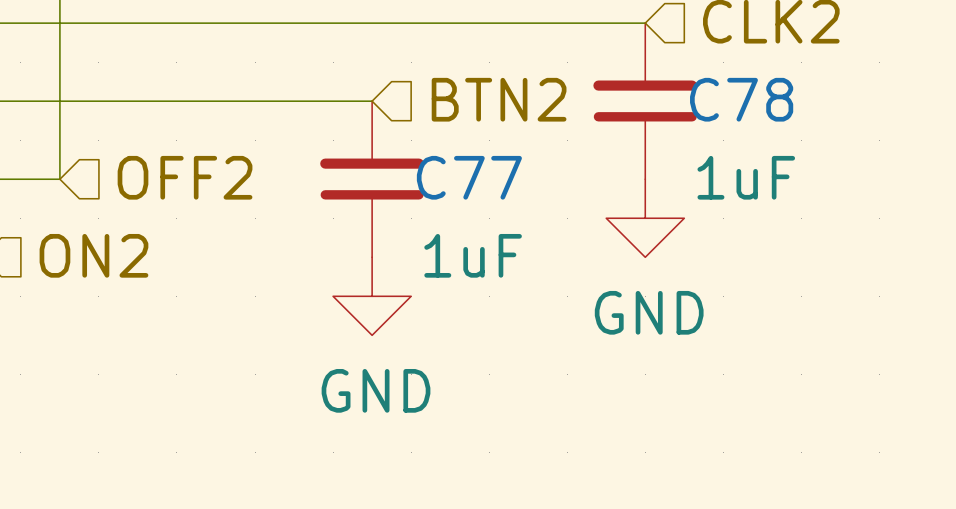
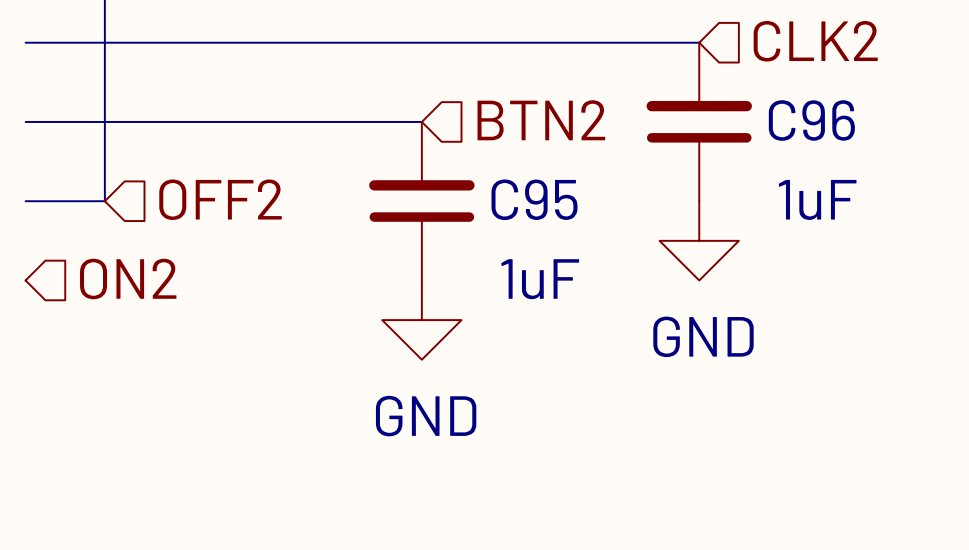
C78 name: C78 (741, 99) -> C96 (811, 120)
C77 name: C77 (469, 177) -> C95 (534, 199)

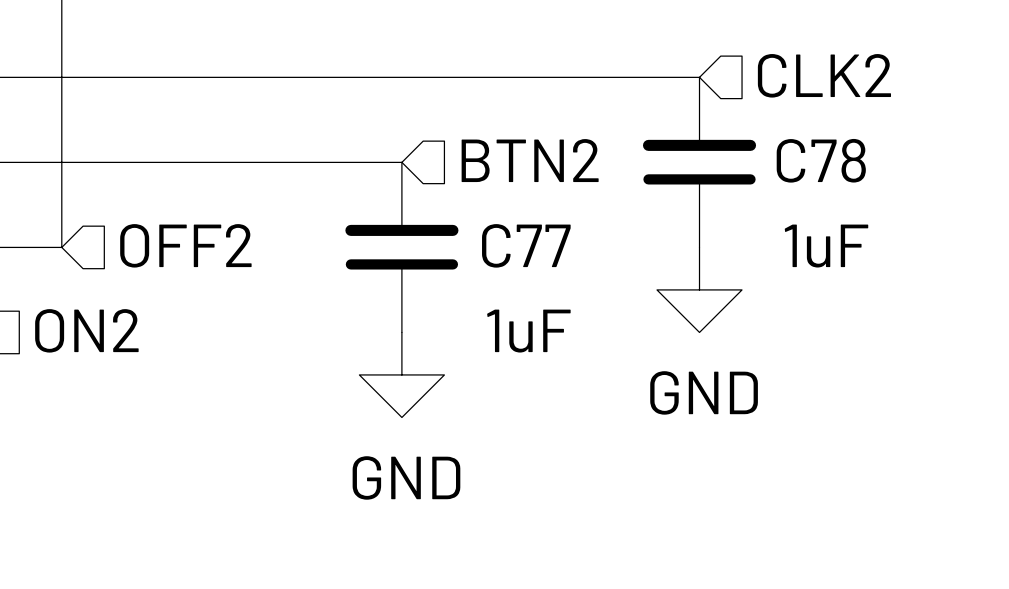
C96 name: C96 (811, 120) -> C78 (821, 160)
C95 name: C95 (534, 199) -> C77 (526, 245)

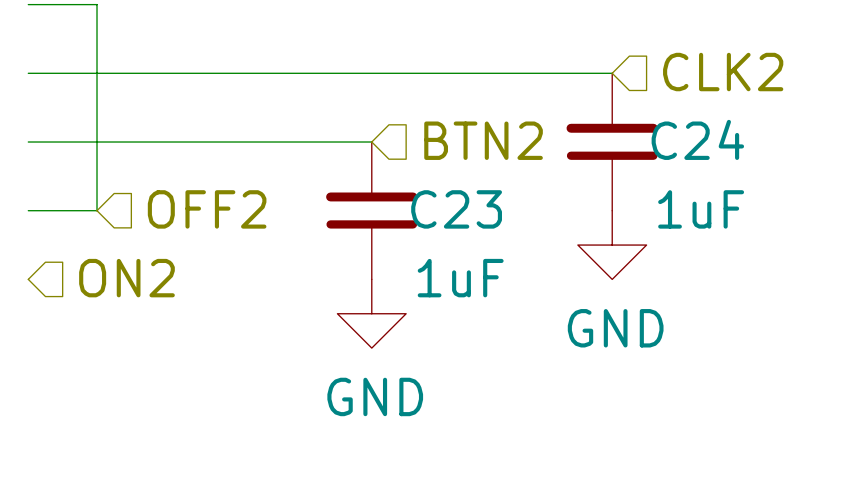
C78 name: C78 (821, 160) -> C24 (697, 139)
C77 name: C77 (526, 245) -> C23 (456, 209)

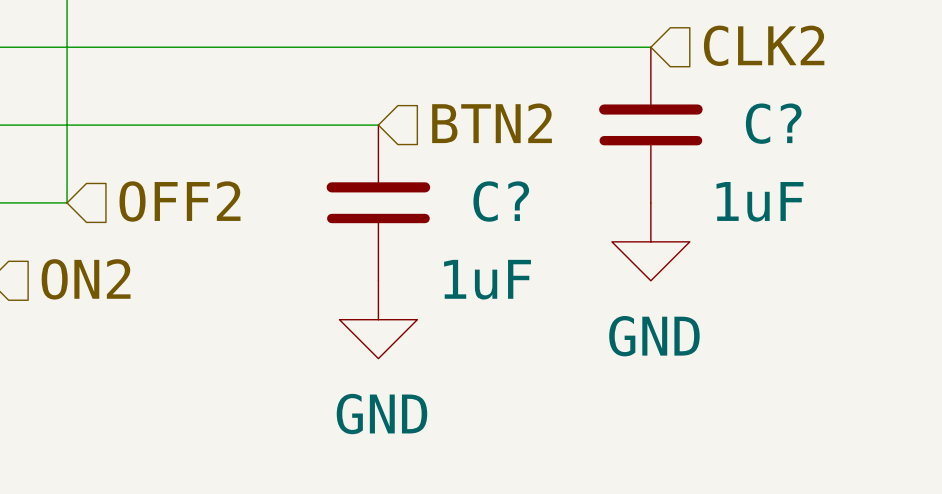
C24 name: C24 (697, 139) -> C? (773, 123)
C23 name: C23 (456, 209) -> C? (501, 201)

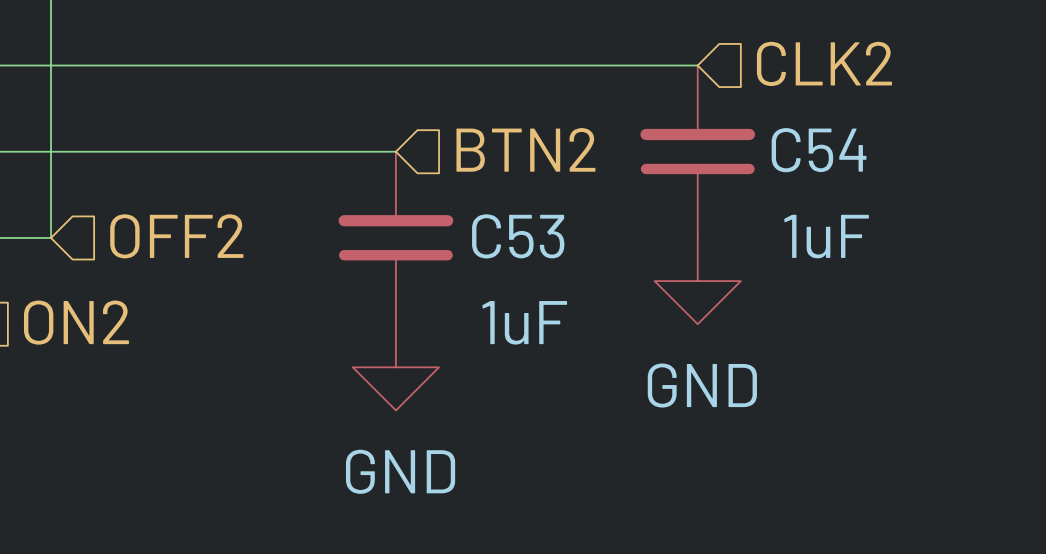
C? name: C? (773, 123) -> C54 (819, 150)
C? name: C? (501, 201) -> C53 (518, 236)

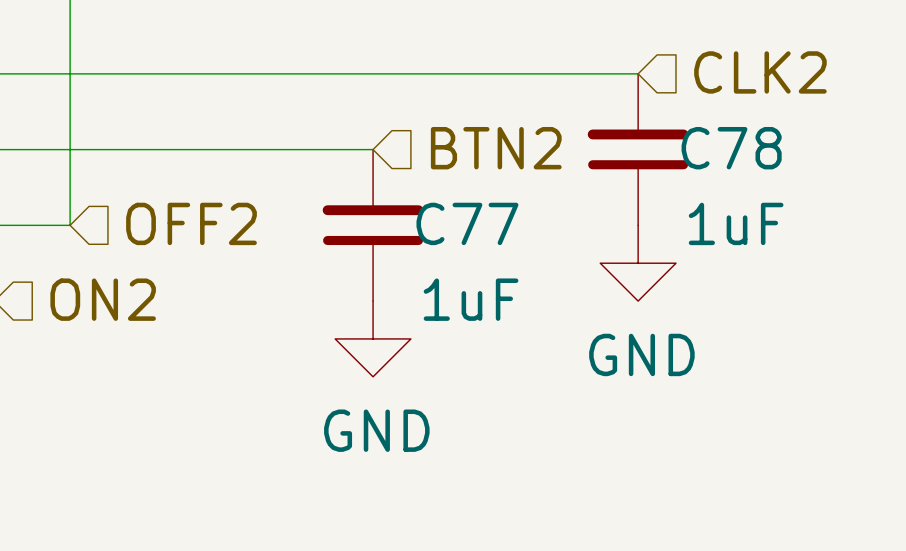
C54 name: C54 (819, 150) -> C78 (731, 148)
C53 name: C53 (518, 236) -> C77 (467, 223)

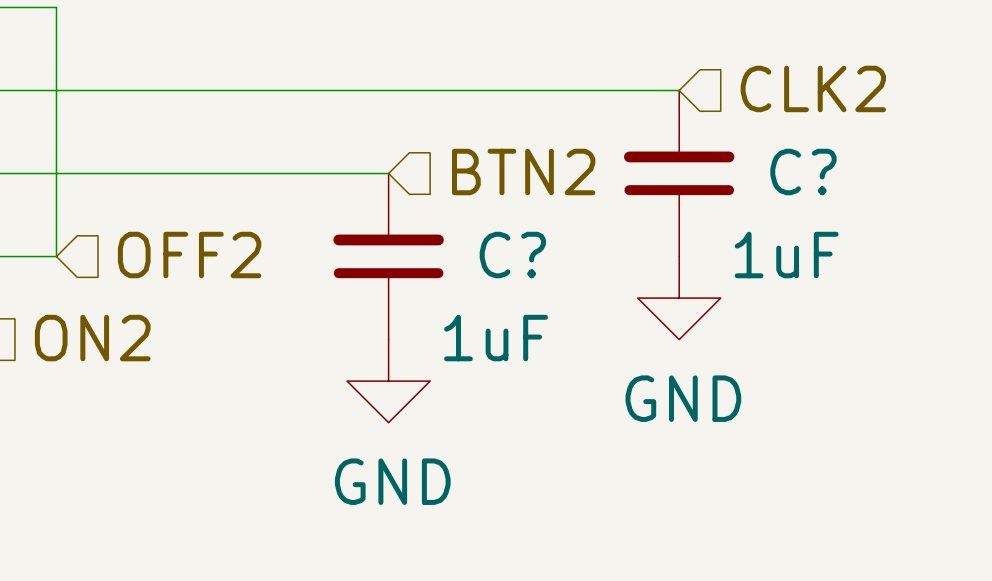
C78 name: C78 (731, 148) -> C? (803, 171)
C77 name: C77 (467, 223) -> C? (512, 255)

